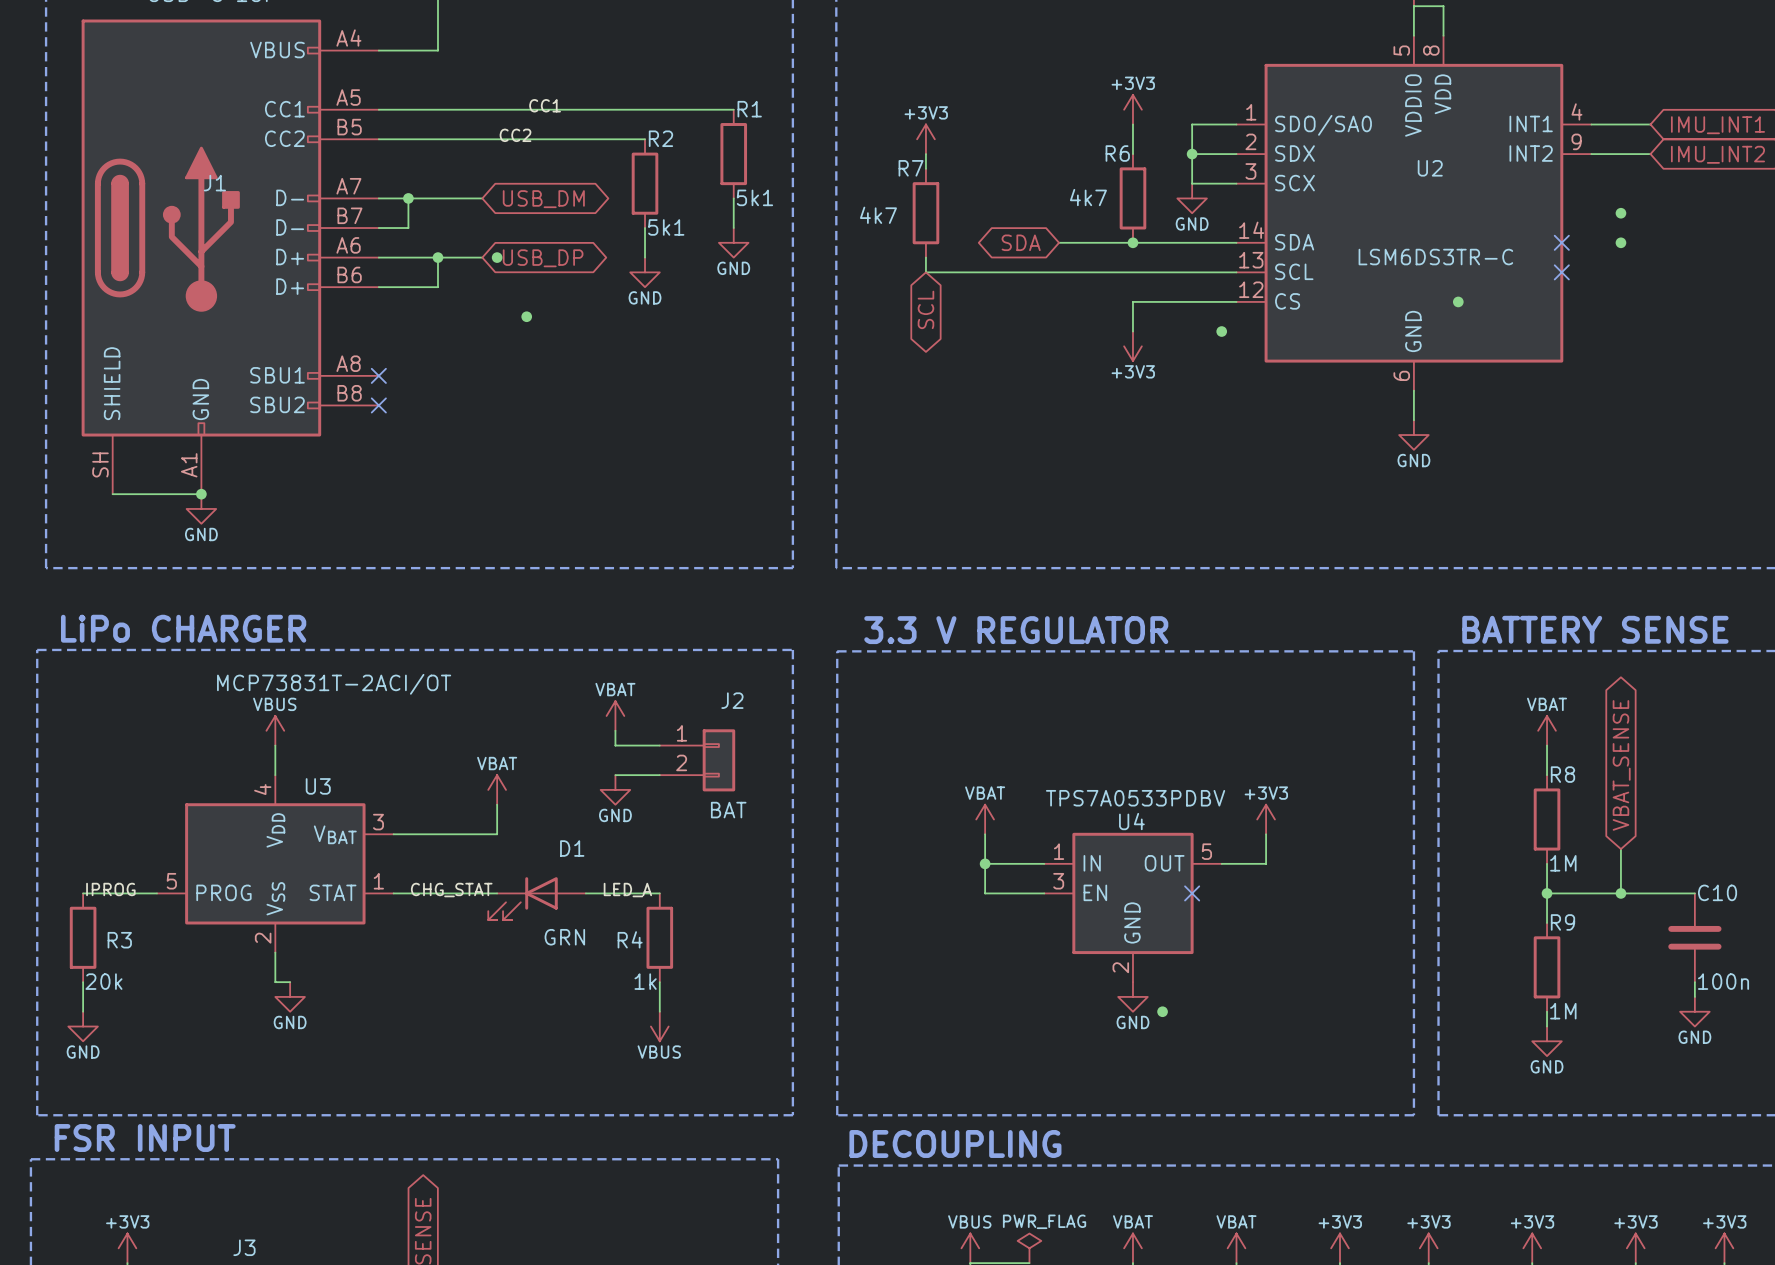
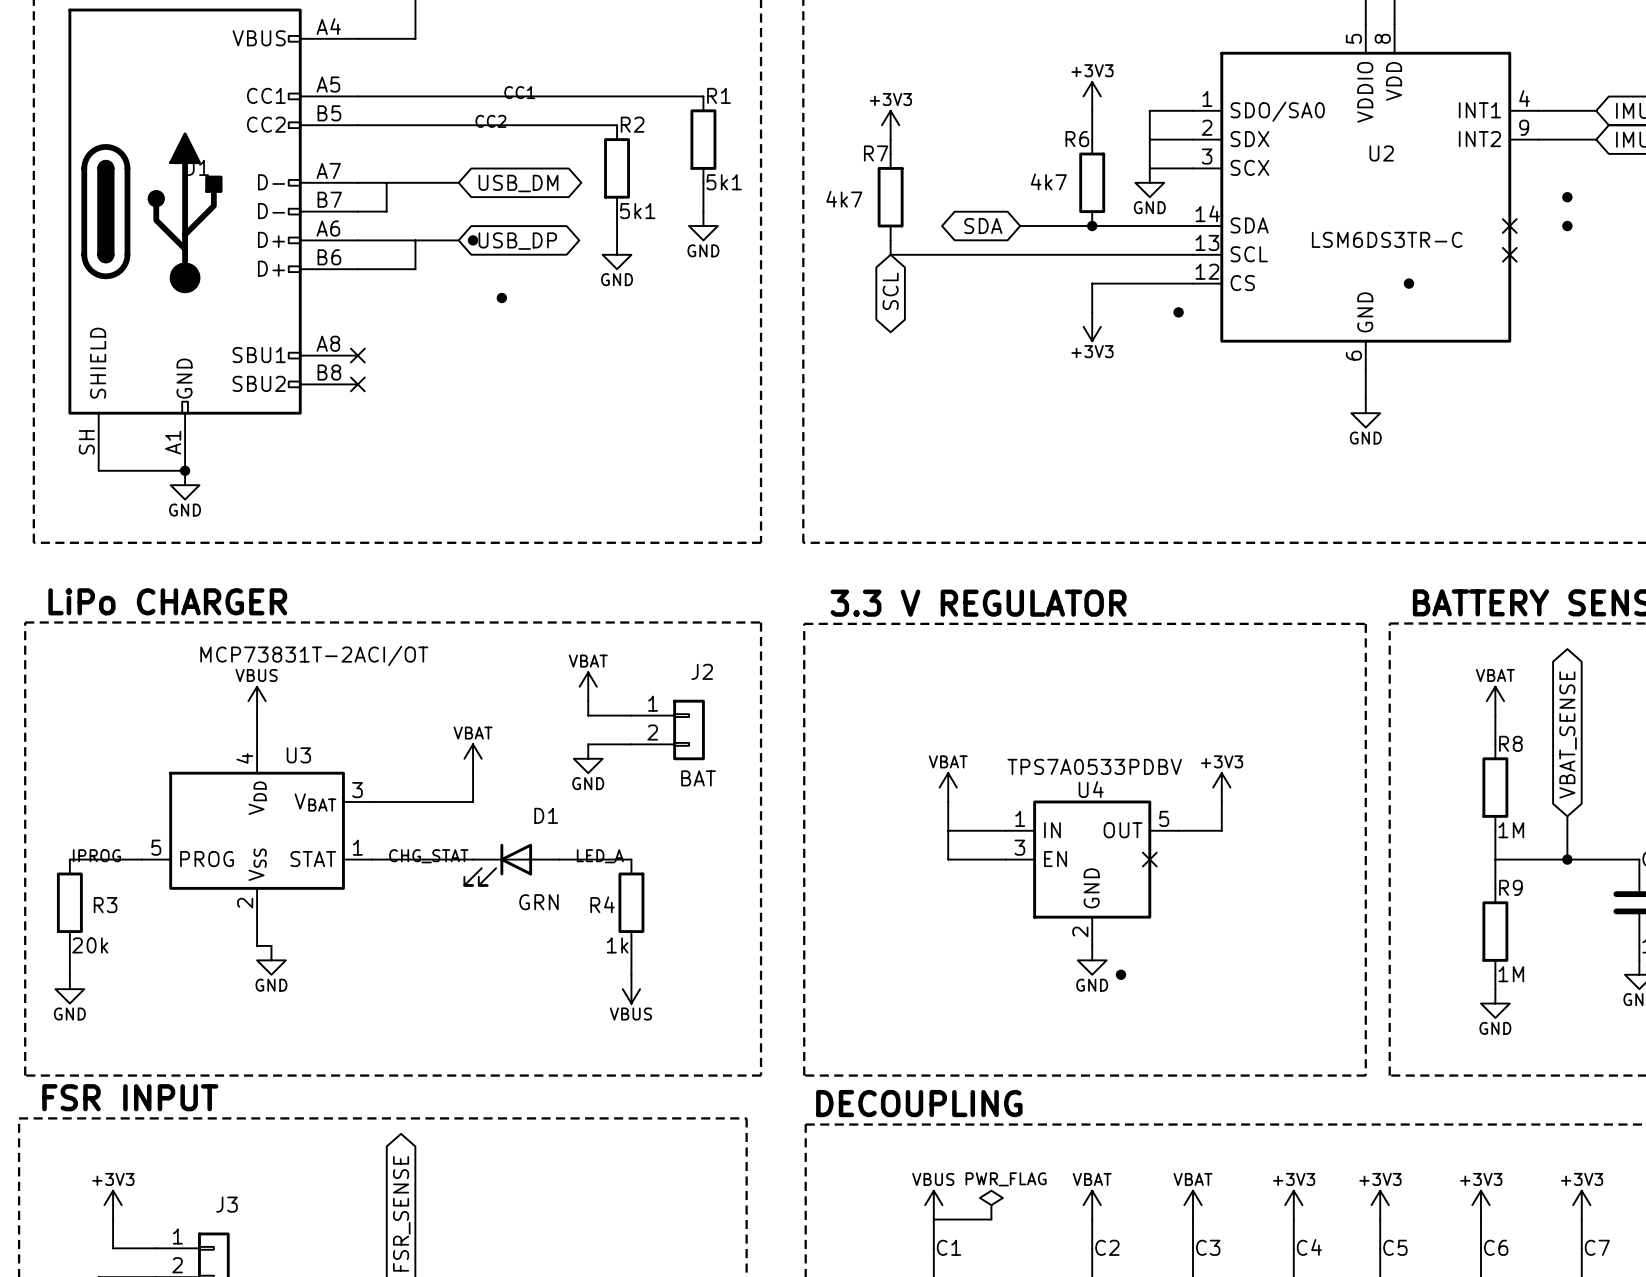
junction: (1192, 154) -> none
junction: (408, 198) -> none
junction: (437, 257) -> none
junction: (985, 863) -> none
junction: (1547, 893) -> none

